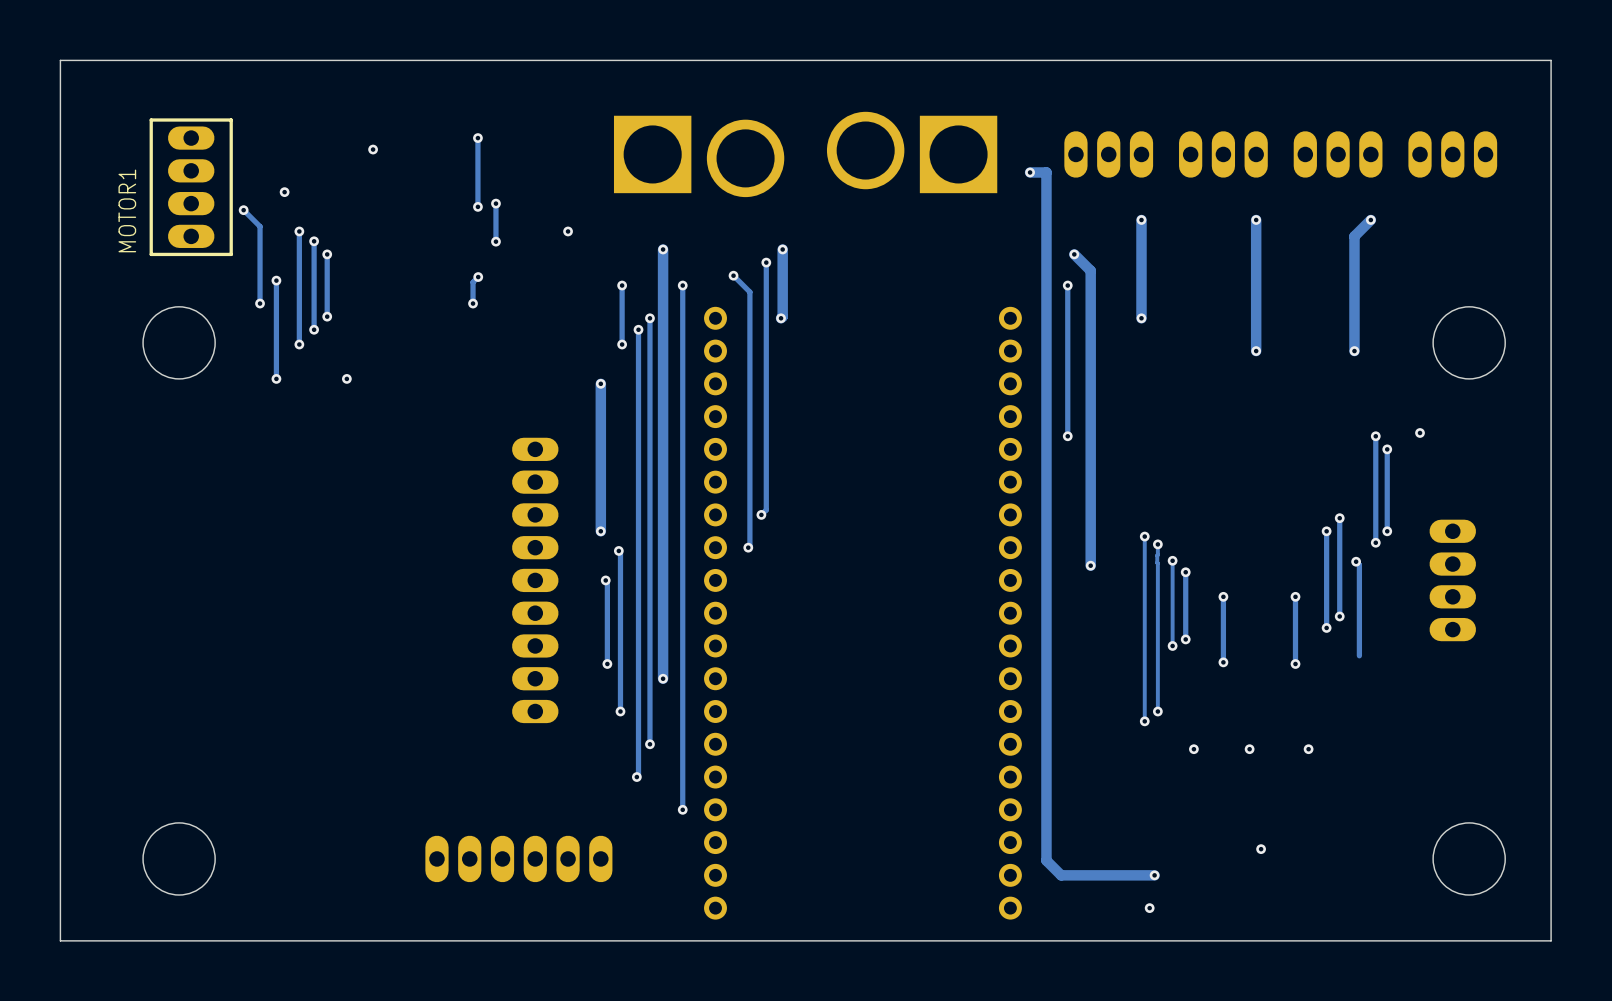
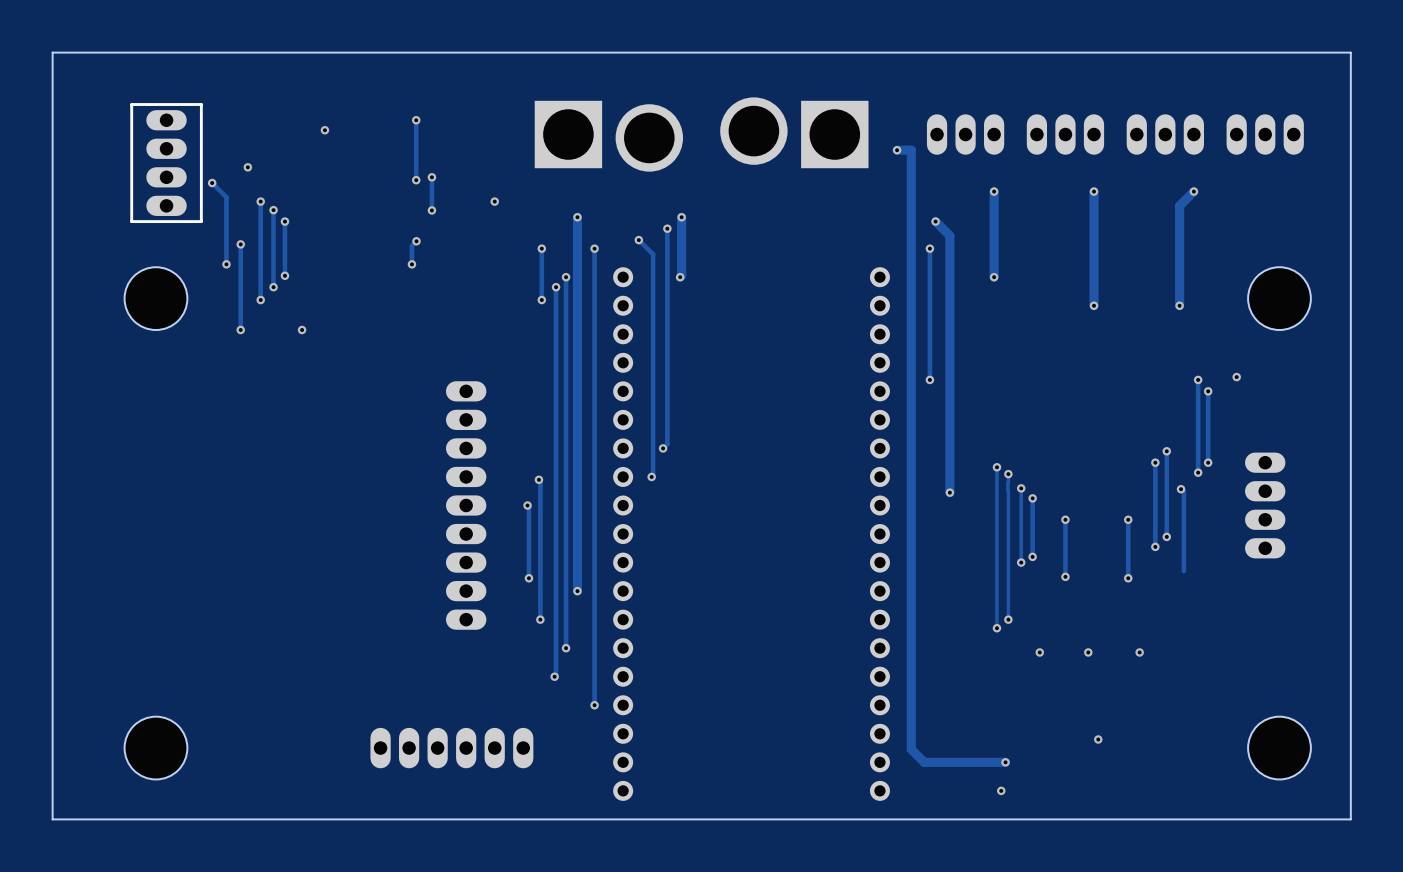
MOTOR1 name: MOTOR1 (127, 210) -> none
track: (600, 383) (600, 531) -> none
via: (600, 383) -> none
via: (600, 531) -> none

